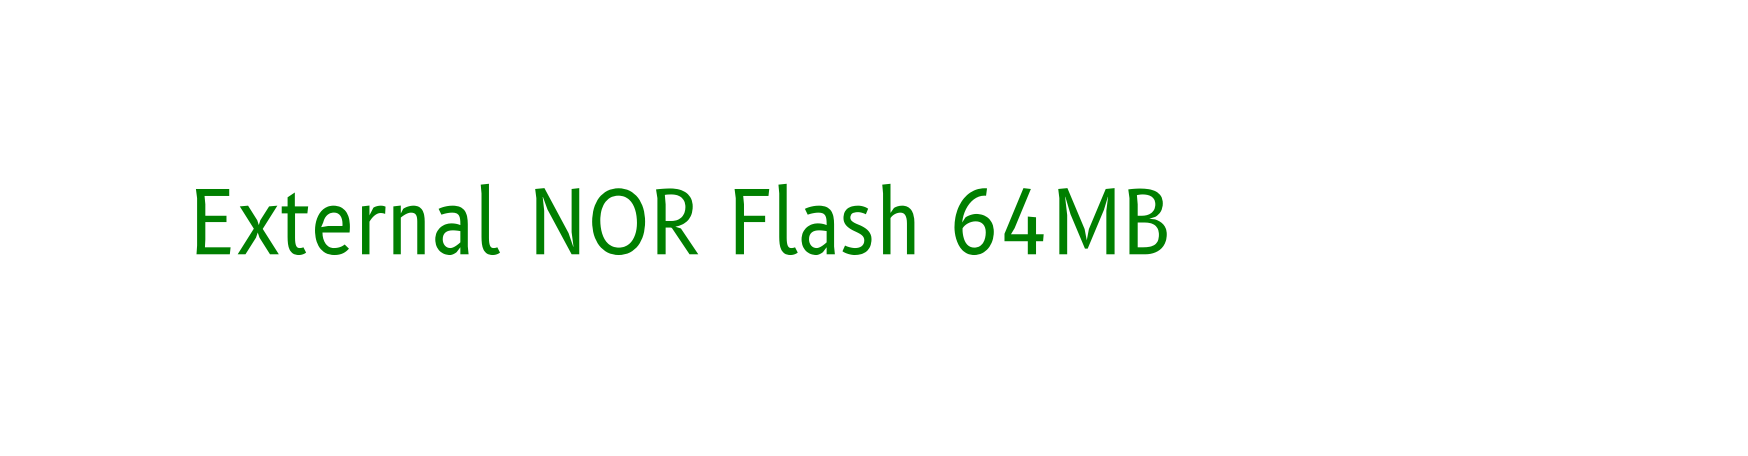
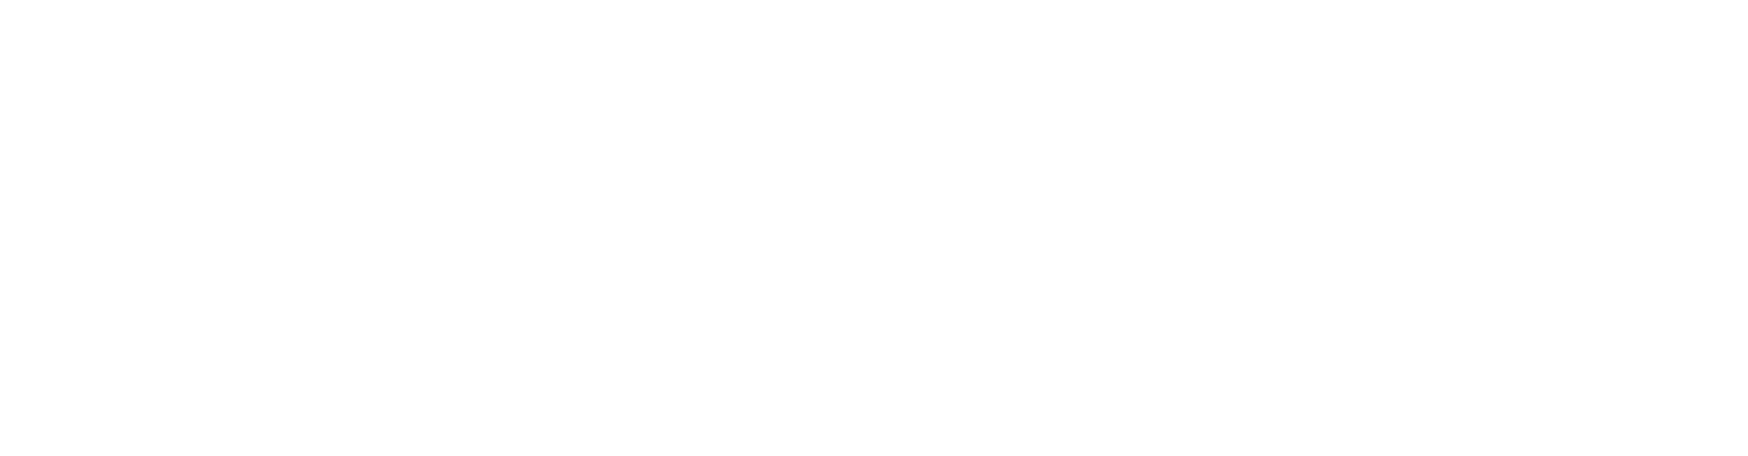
text: External NOR Flash 64MB (681, 219) -> none

